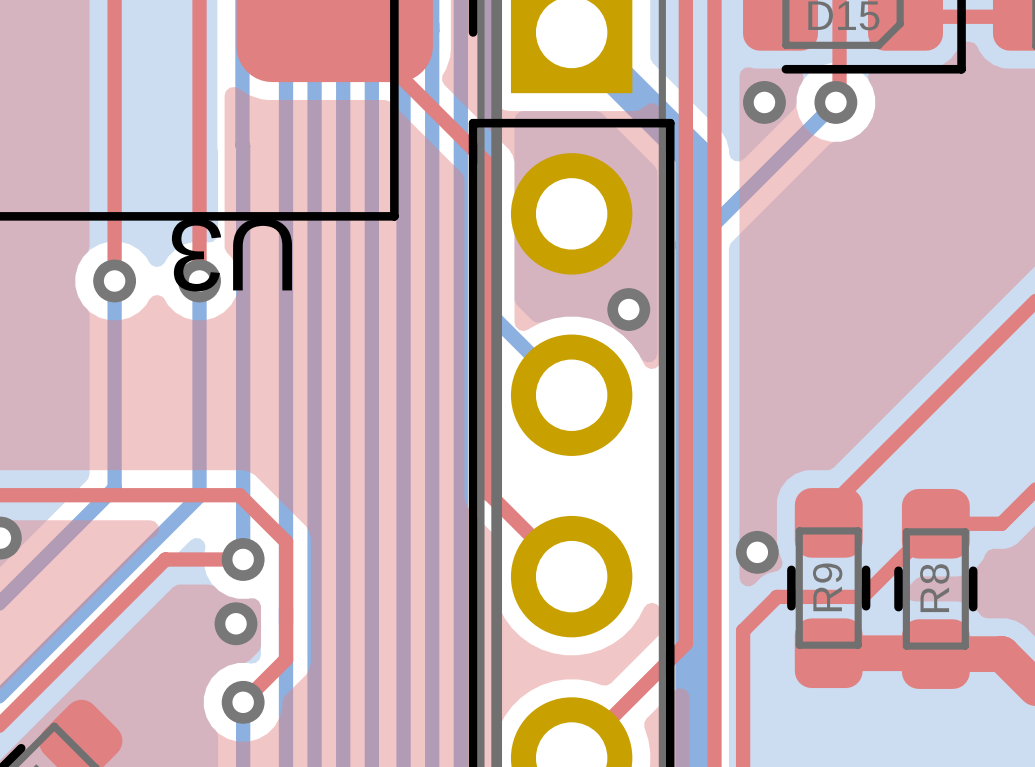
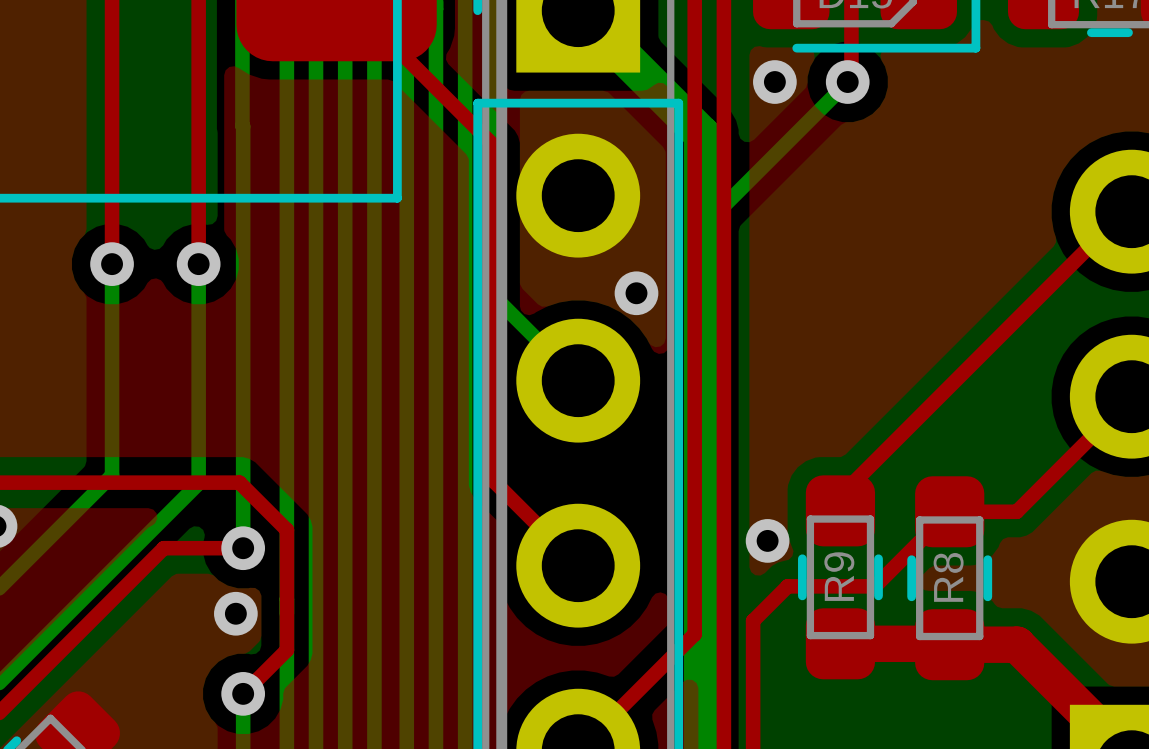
U3 name: U3 (231, 254) -> none

